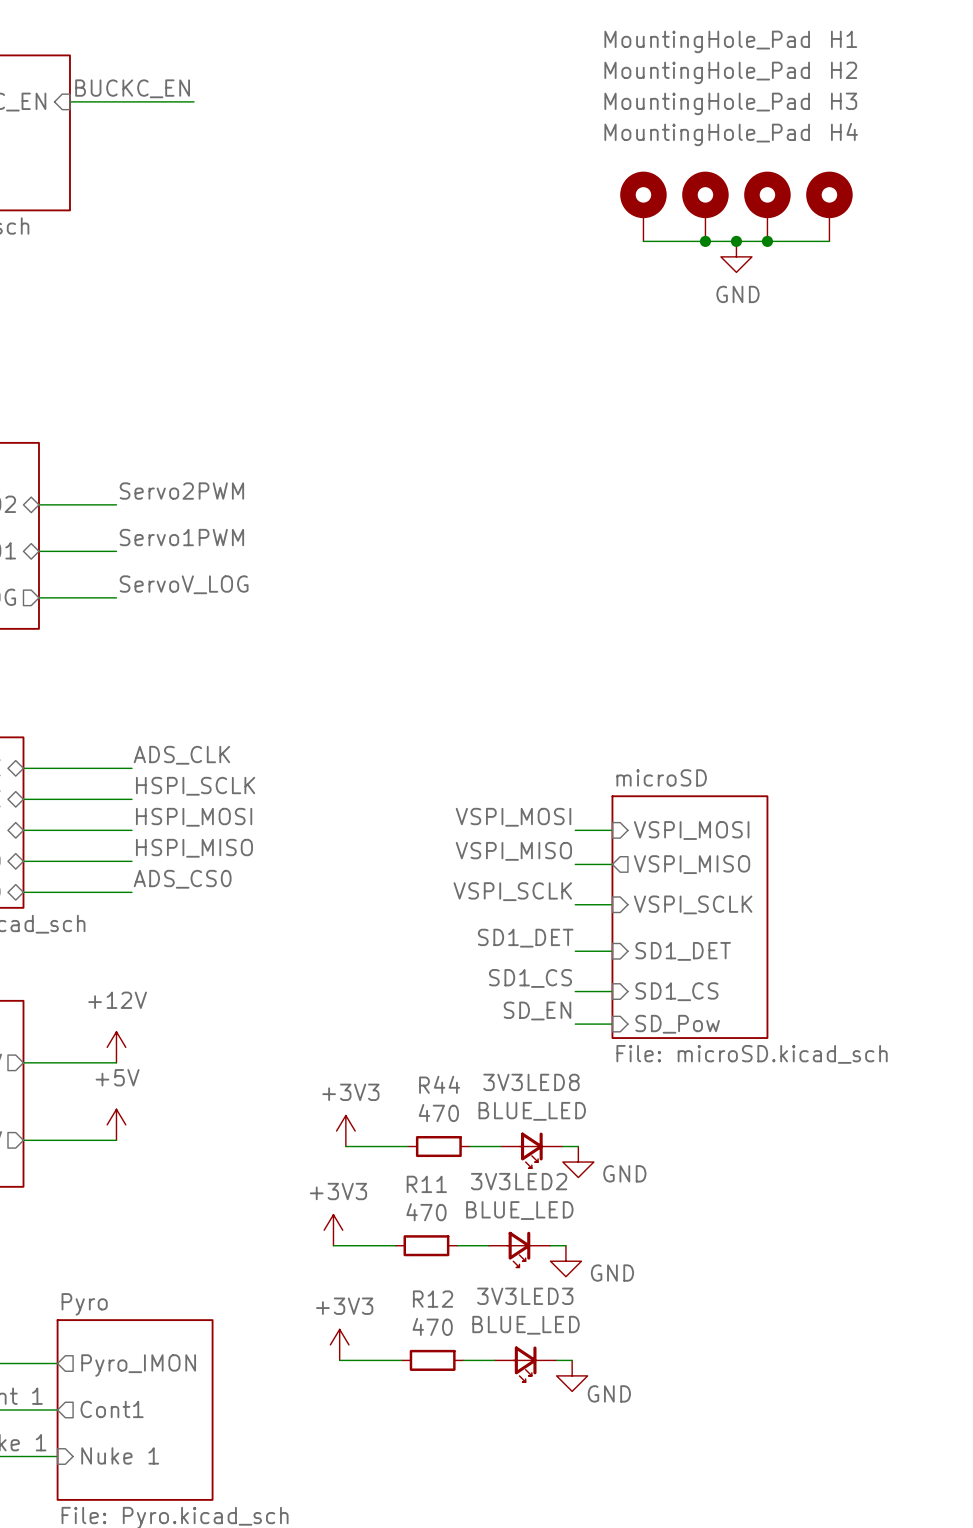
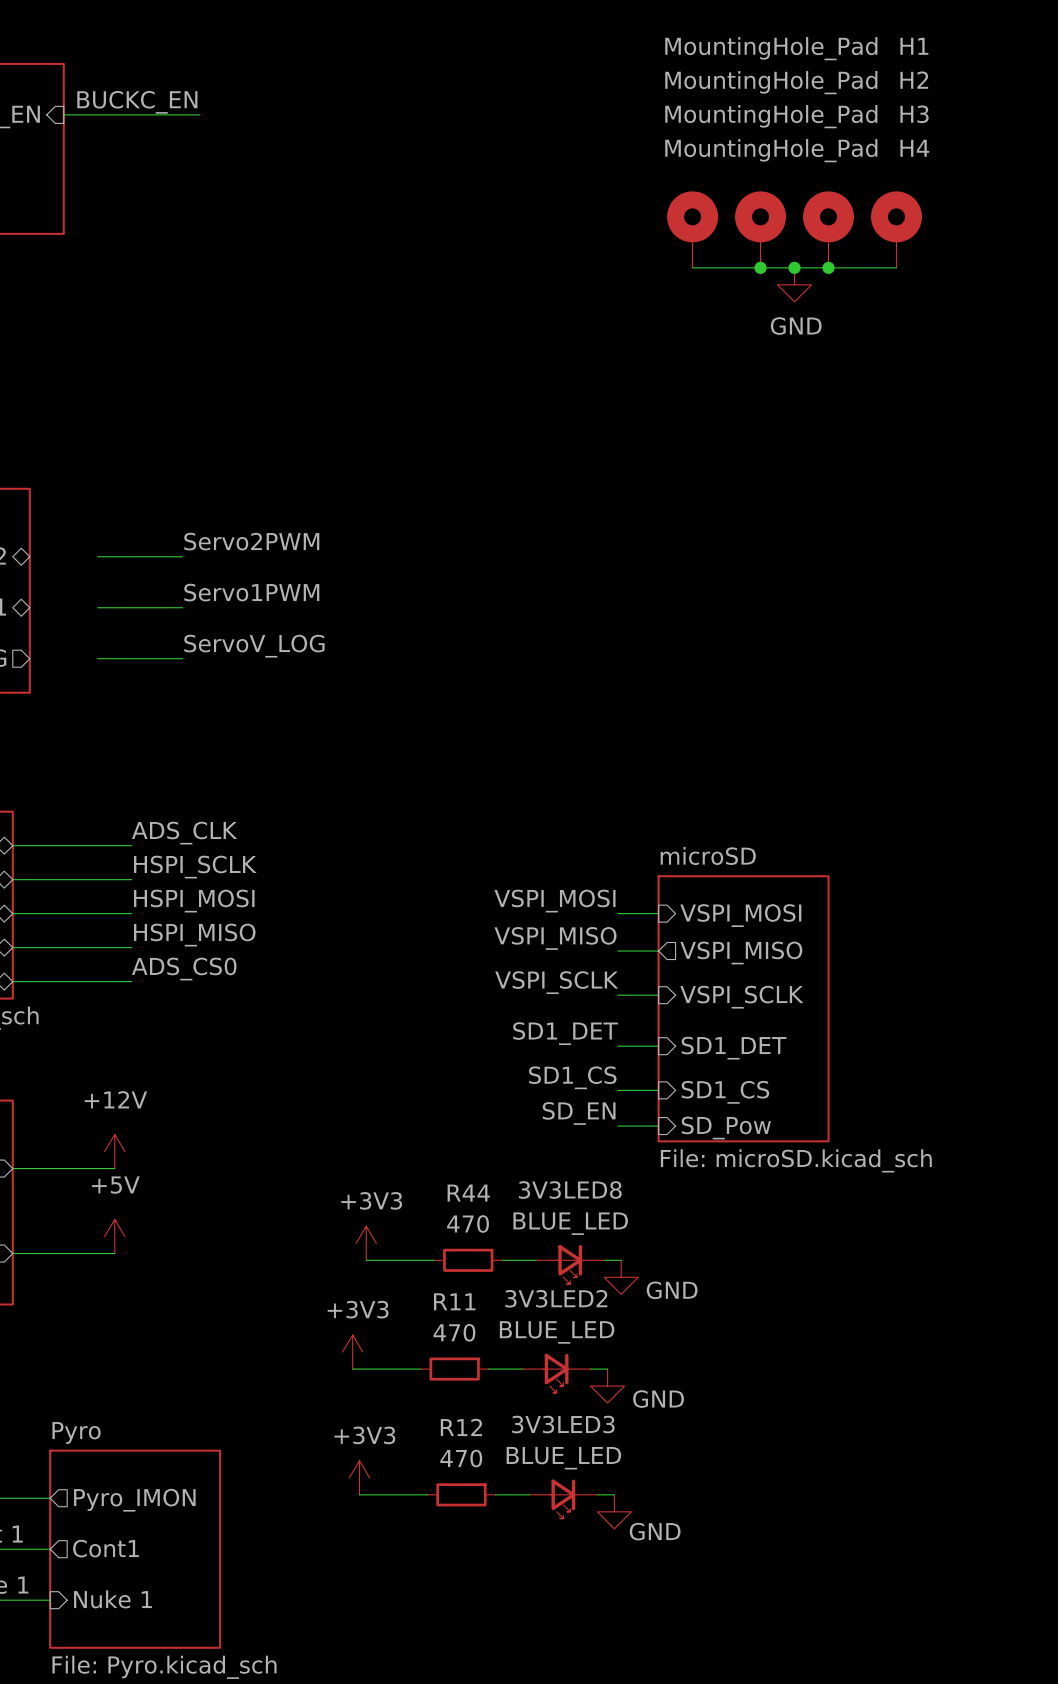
label position: Servo2PWM (181, 491) -> Servo2PWM (251, 541)
wire: (38, 504) (100, 504) -> (114, 556) (182, 556)
label position: Servo1PWM (181, 537) -> Servo1PWM (251, 592)
wire: (38, 551) (100, 551) -> (114, 607) (182, 607)
label position: ServoV_LOG (184, 584) -> ServoV_LOG (254, 646)
wire: (38, 597) (100, 597) -> (114, 658) (182, 658)

